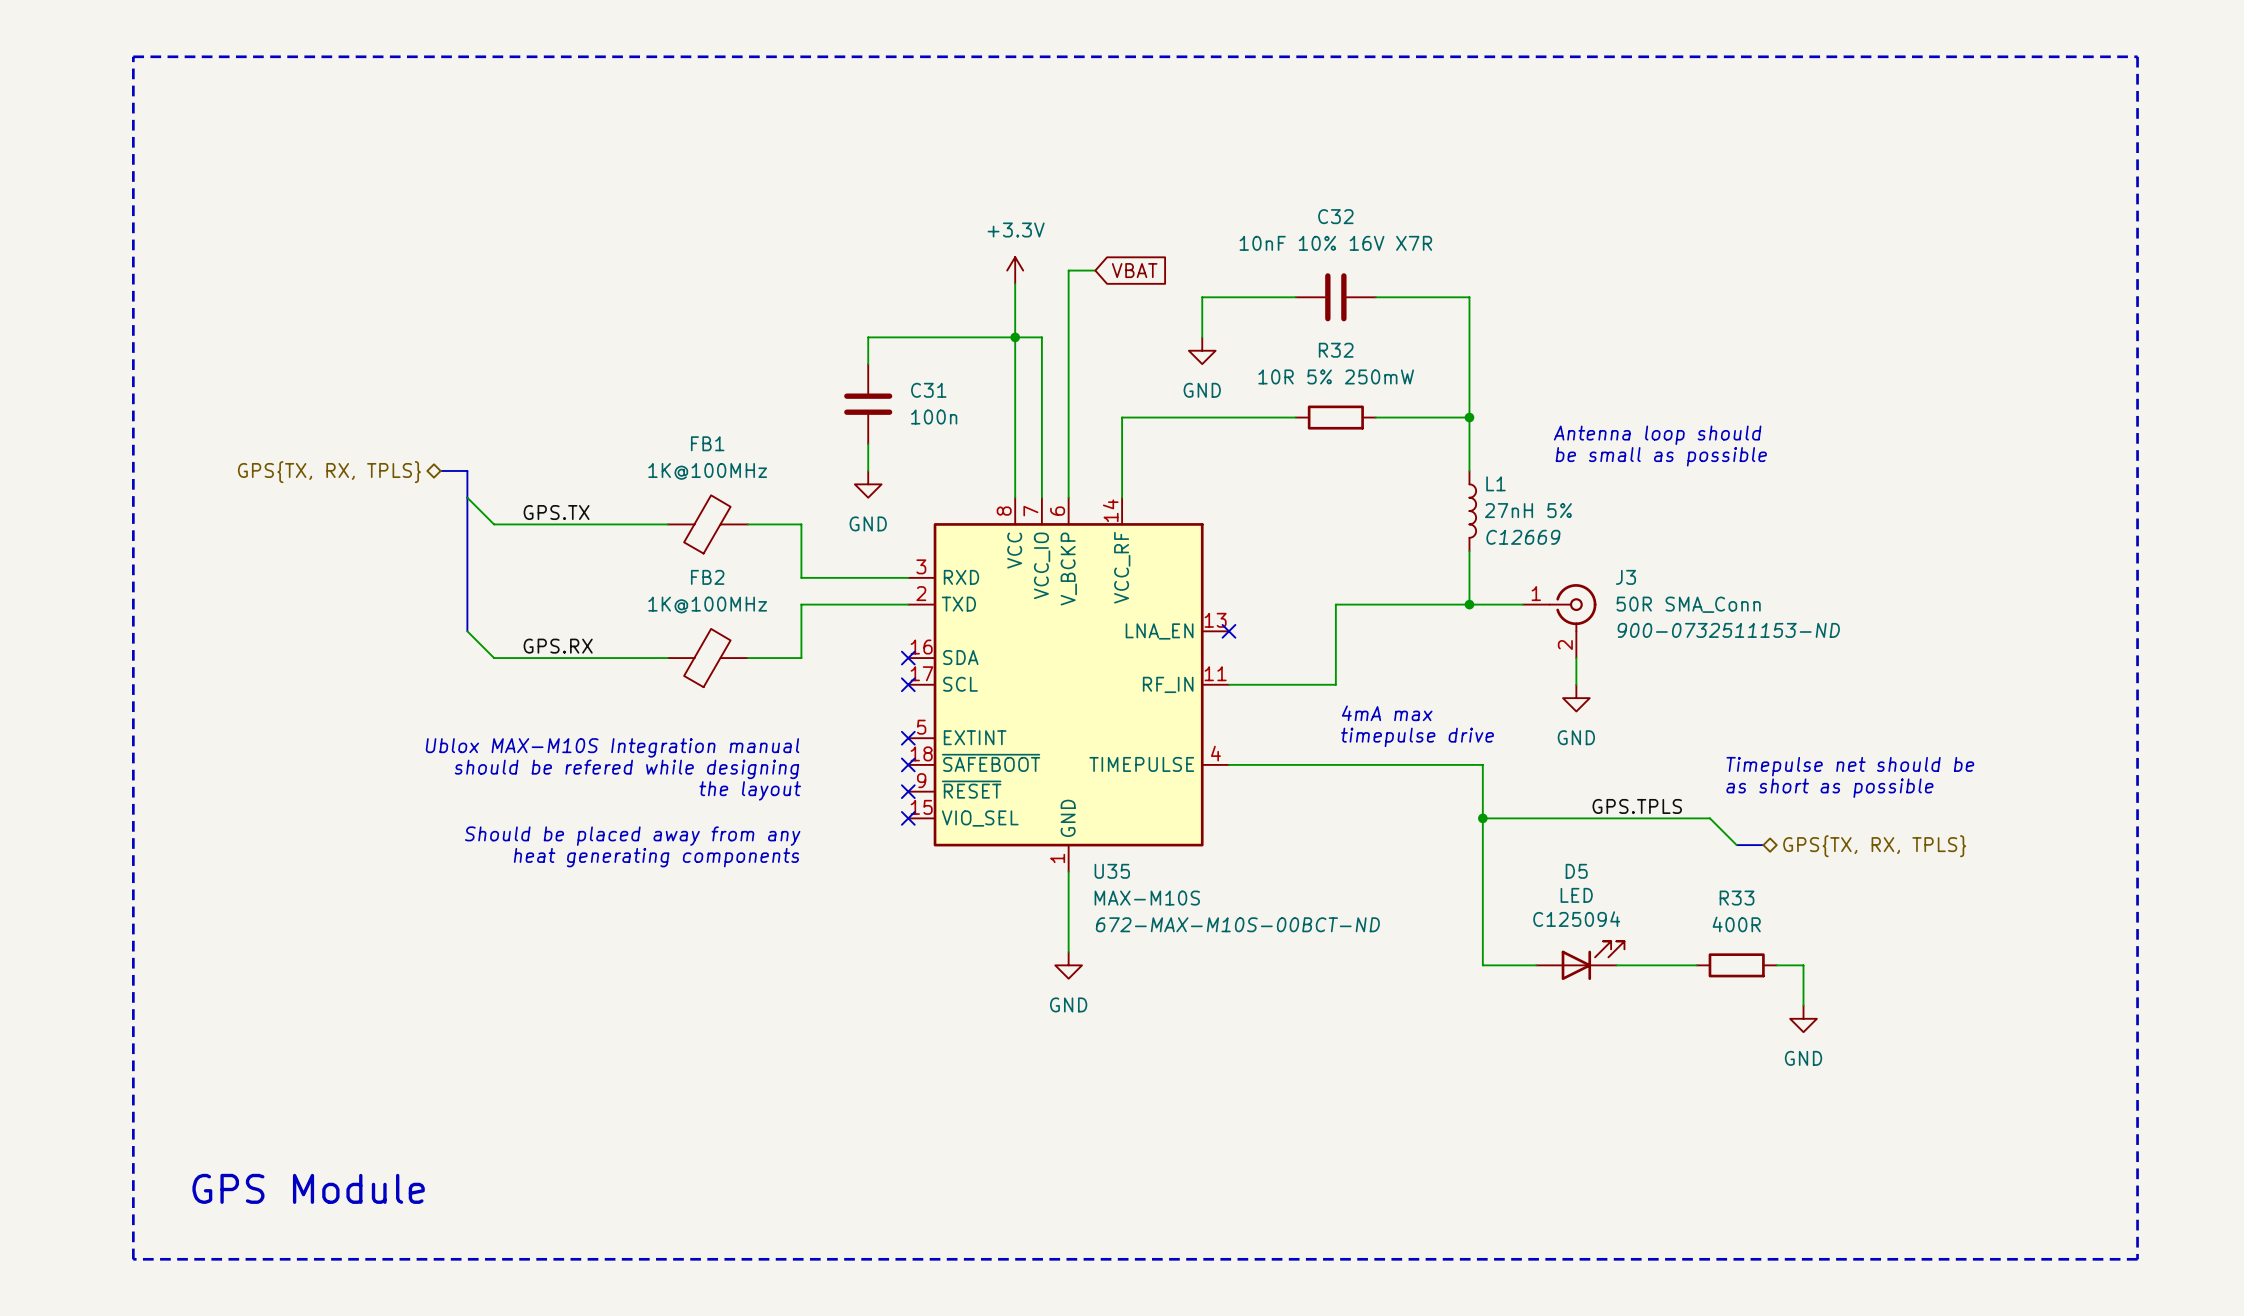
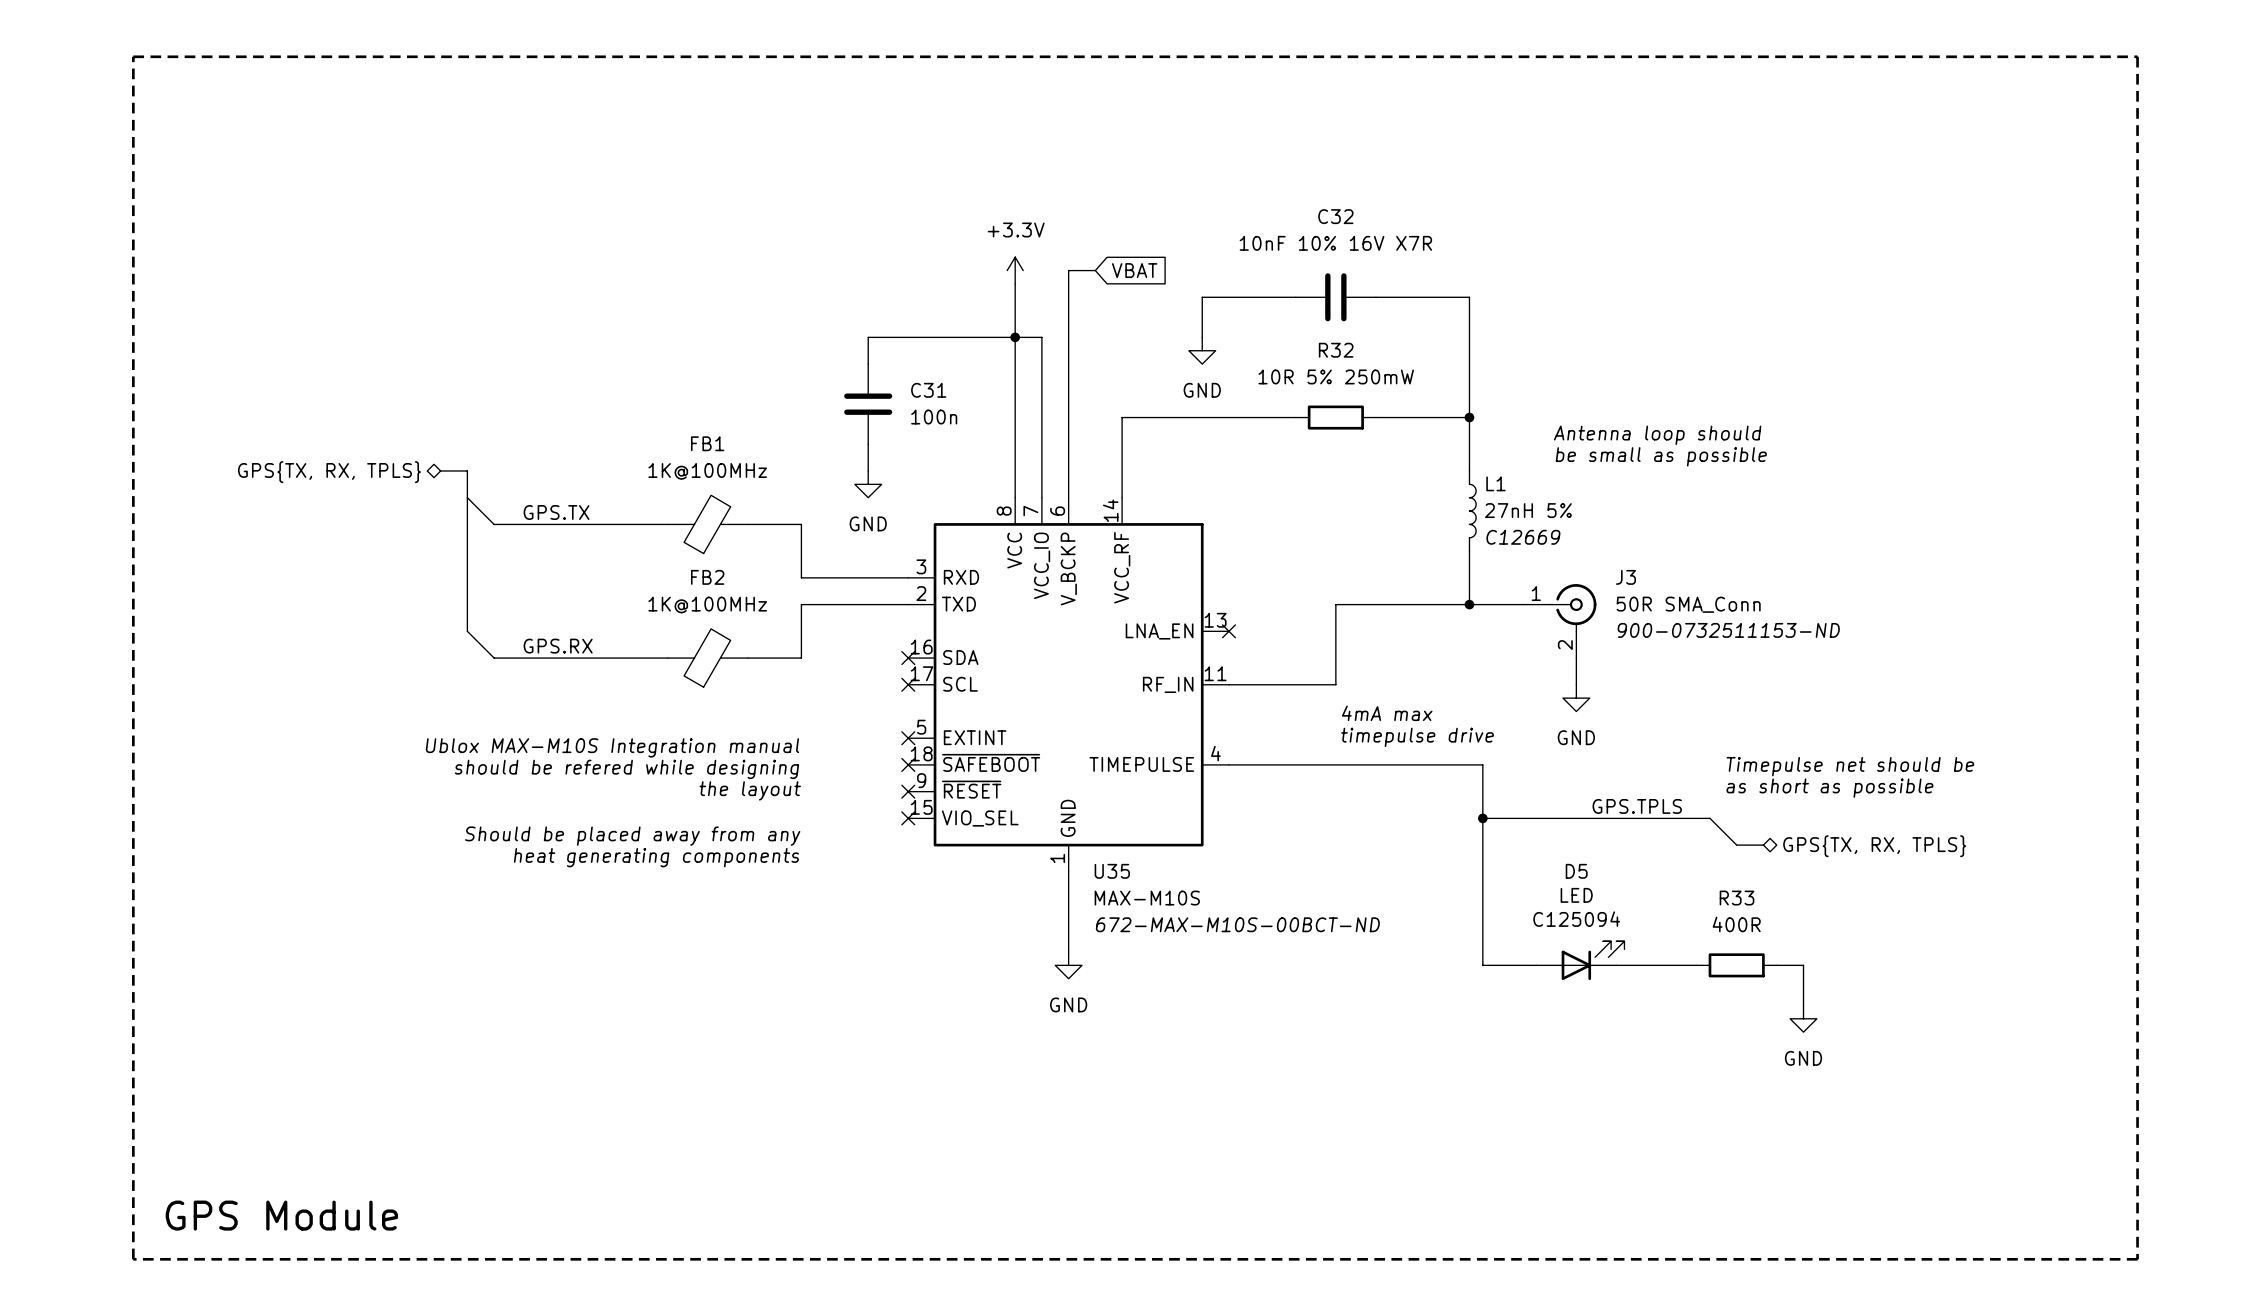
text position: GPS Module (308, 1188) -> GPS Module (281, 1215)

